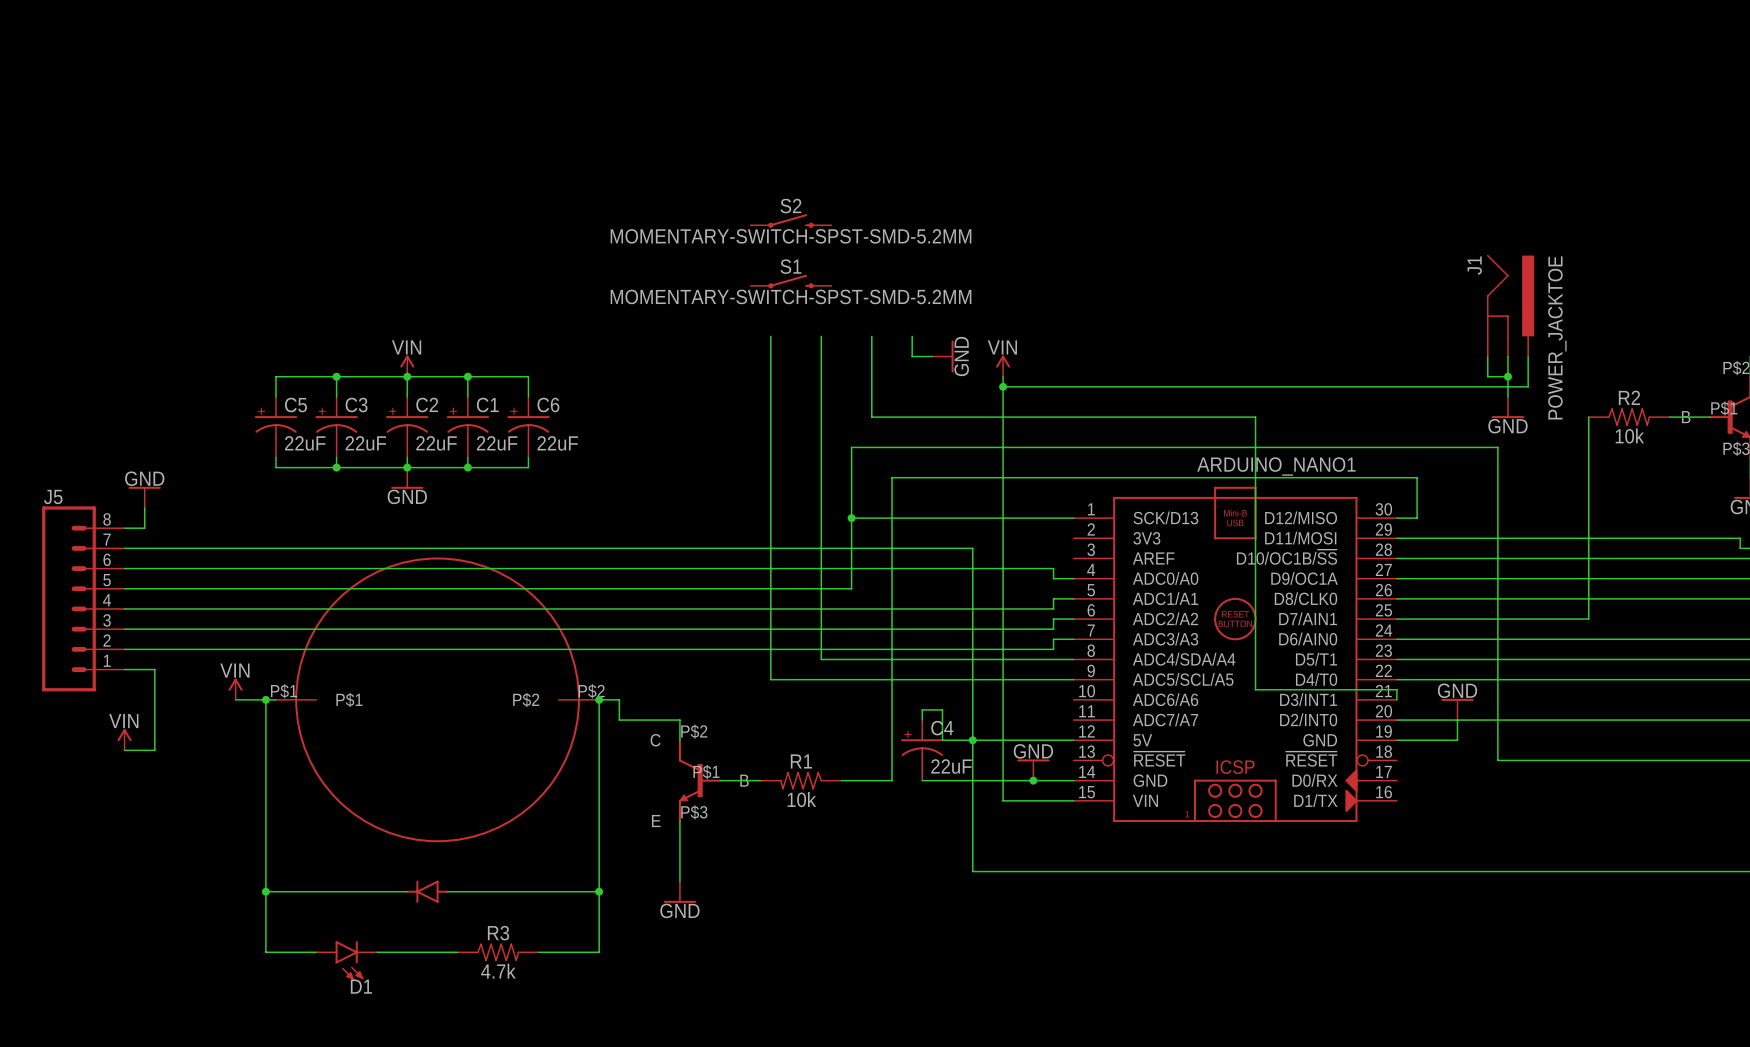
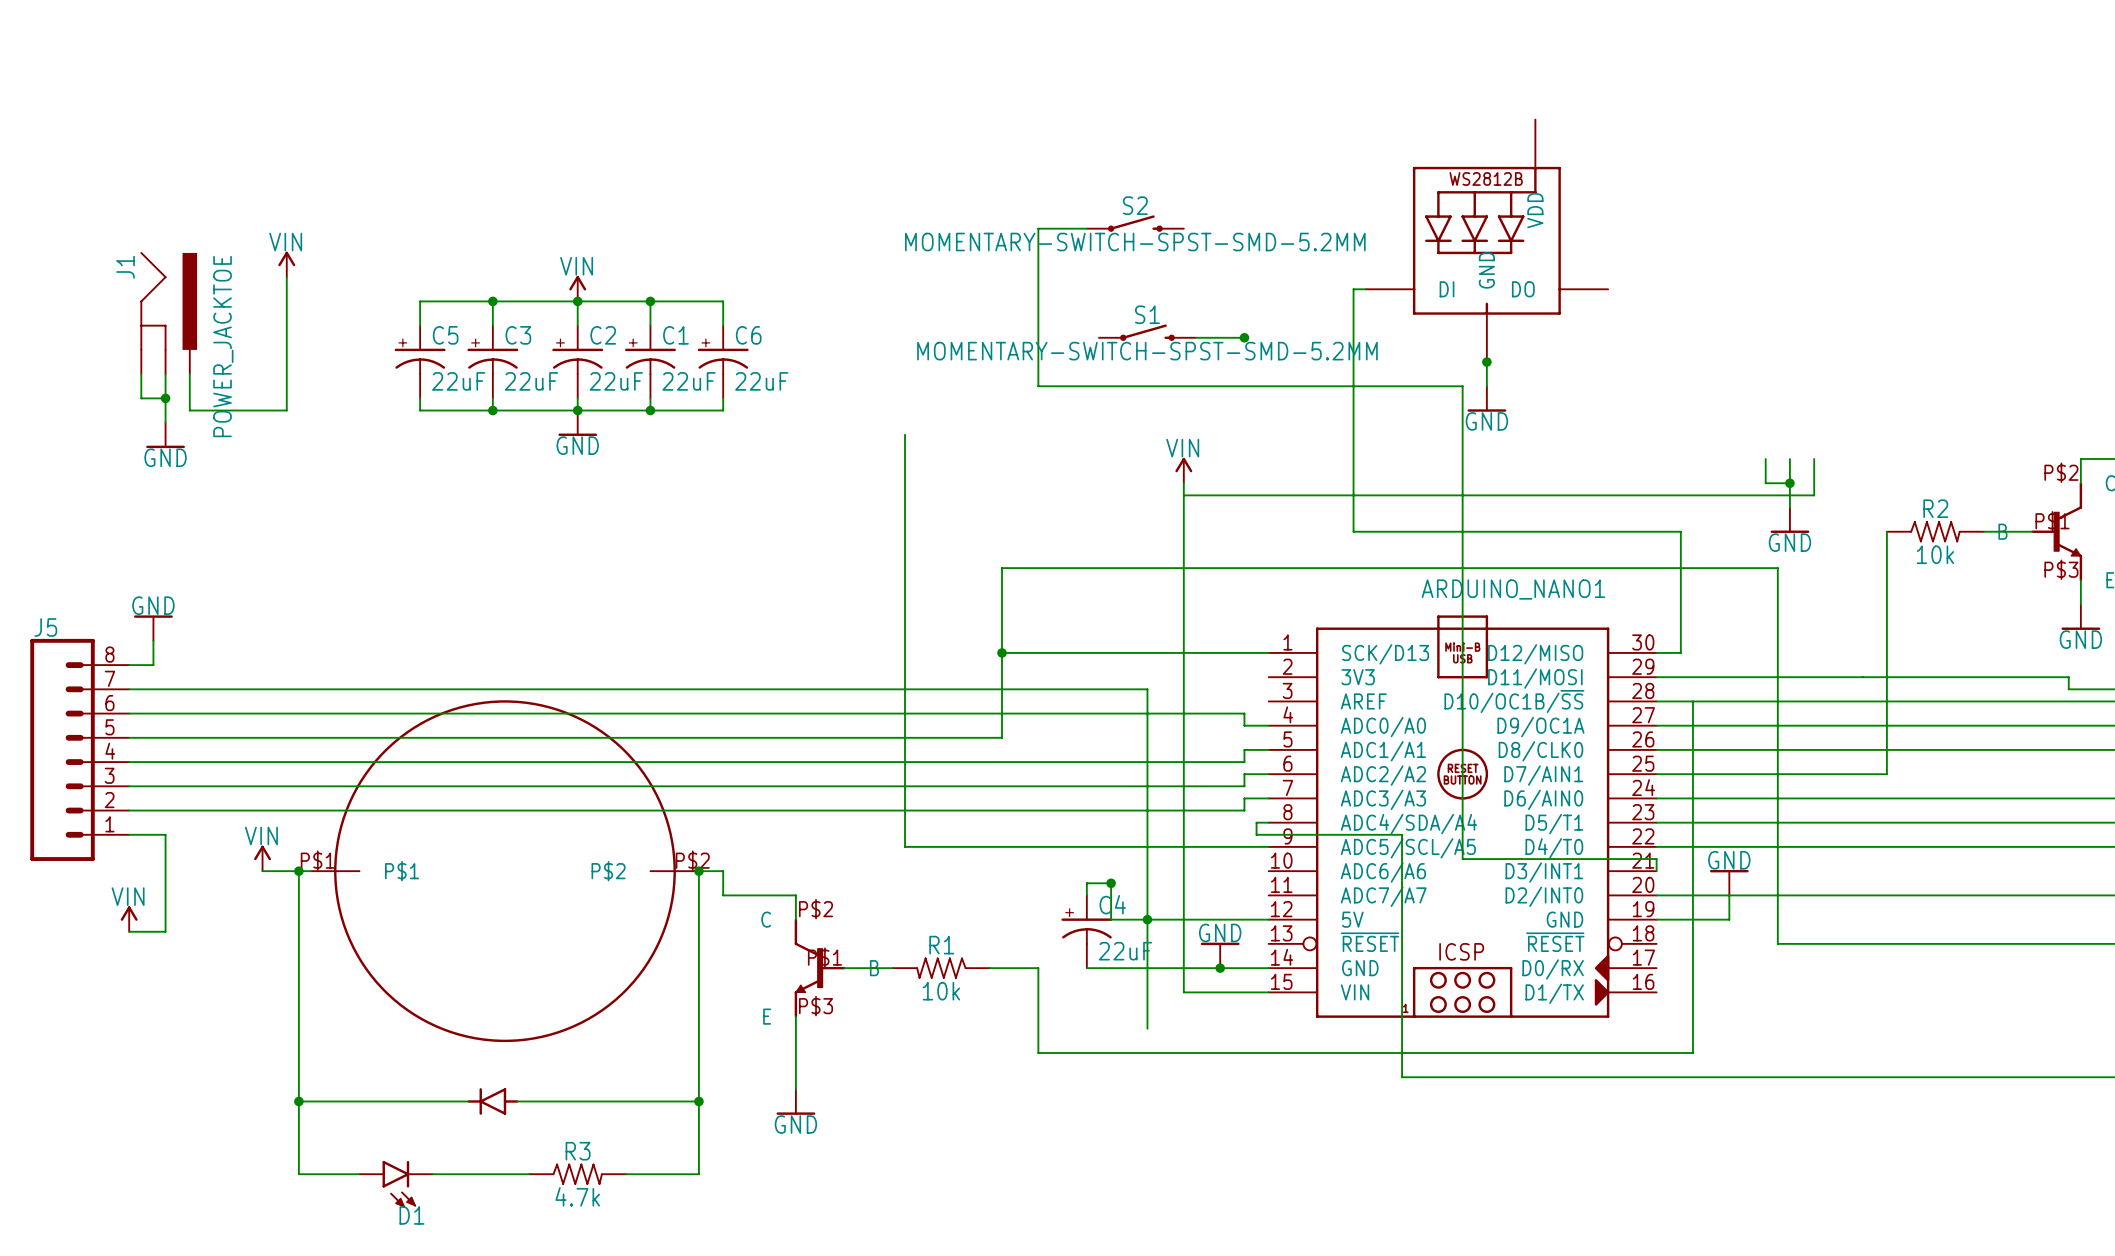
wire: none -> (1086, 228) (1038, 228) (1038, 386) (1462, 386) (1462, 859) (1486, 859)
part: none -> (1486, 240)
power symbol: none -> VIN (286, 264)
wire: none -> (286, 277) (286, 410) (189, 410) (189, 374)
power symbol: none -> VIN (577, 288)
S2 position: (791, 221) -> (1135, 223)
junction: none -> (492, 301)
junction: none -> (577, 301)
junction: none -> (650, 301)
wire: none -> (1195, 337) (1244, 337)
junction: none -> (1244, 337)
wire: none -> (1486, 362) (1486, 386)
junction: none -> (1486, 362)
S1 position: (791, 281) -> (1147, 332)
wire: none -> (141, 374) (141, 398) (165, 398)
wire: none -> (165, 374) (165, 422)
J1 position: (1510, 305) -> (168, 313)
junction: none -> (165, 398)
power symbol: none -> GND (1486, 399)
junction: none -> (492, 410)
junction: none -> (577, 410)
junction: none -> (650, 410)
power symbol: none -> GND (577, 423)
power symbol: none -> GND (165, 435)
wire: (821, 336) (821, 659) (1063, 659) -> none
wire: (871, 336) (871, 417) (1144, 417) -> (1365, 289) (1353, 289) (1353, 531)
wire: (912, 336) (912, 356) (932, 356) -> none
power symbol: GND (942, 356) -> none
power symbol: VIN (407, 366) -> none
wire: (336, 376) (336, 396) -> (492, 301) (492, 325)
junction: (336, 376) -> none
wire: (407, 376) (407, 396) -> (577, 301) (577, 325)
junction: (407, 376) -> none
wire: (467, 376) (467, 396) -> (650, 301) (650, 325)
junction: (467, 376) -> none
junction: (1003, 386) -> none
wire: (276, 396) (276, 376) (528, 376) (528, 396) -> (420, 325) (420, 301) (723, 301) (723, 325)
wire: (1255, 417) (1255, 689) -> (1486, 531) (1680, 531) (1680, 604)
C5 position: (276, 427) -> (420, 362)
C3 position: (336, 427) -> (492, 362)
C2 position: (407, 427) -> (577, 362)
C1 position: (467, 427) -> (650, 362)
C6 position: (528, 427) -> (723, 362)
wire: (276, 457) (276, 467) (528, 467) (528, 457) -> (420, 398) (420, 410) (723, 410) (723, 398)
wire: (336, 457) (336, 467) -> (492, 398) (492, 410)
wire: (407, 457) (407, 467) -> (577, 398) (577, 410)
wire: (467, 457) (467, 467) -> (650, 398) (650, 410)
junction: (336, 467) -> none
junction: (407, 467) -> none
junction: (467, 467) -> none
wire: (1417, 477) (891, 477) (891, 780) (881, 780) -> (1692, 701) (1692, 1053) (1038, 1053) (1038, 968)
power symbol: GND (407, 478) -> none
junction: none -> (1111, 883)
wire: (972, 831) (972, 871) (1184, 871) -> (1256, 822) (1256, 834) (1402, 834) (1402, 1077)

